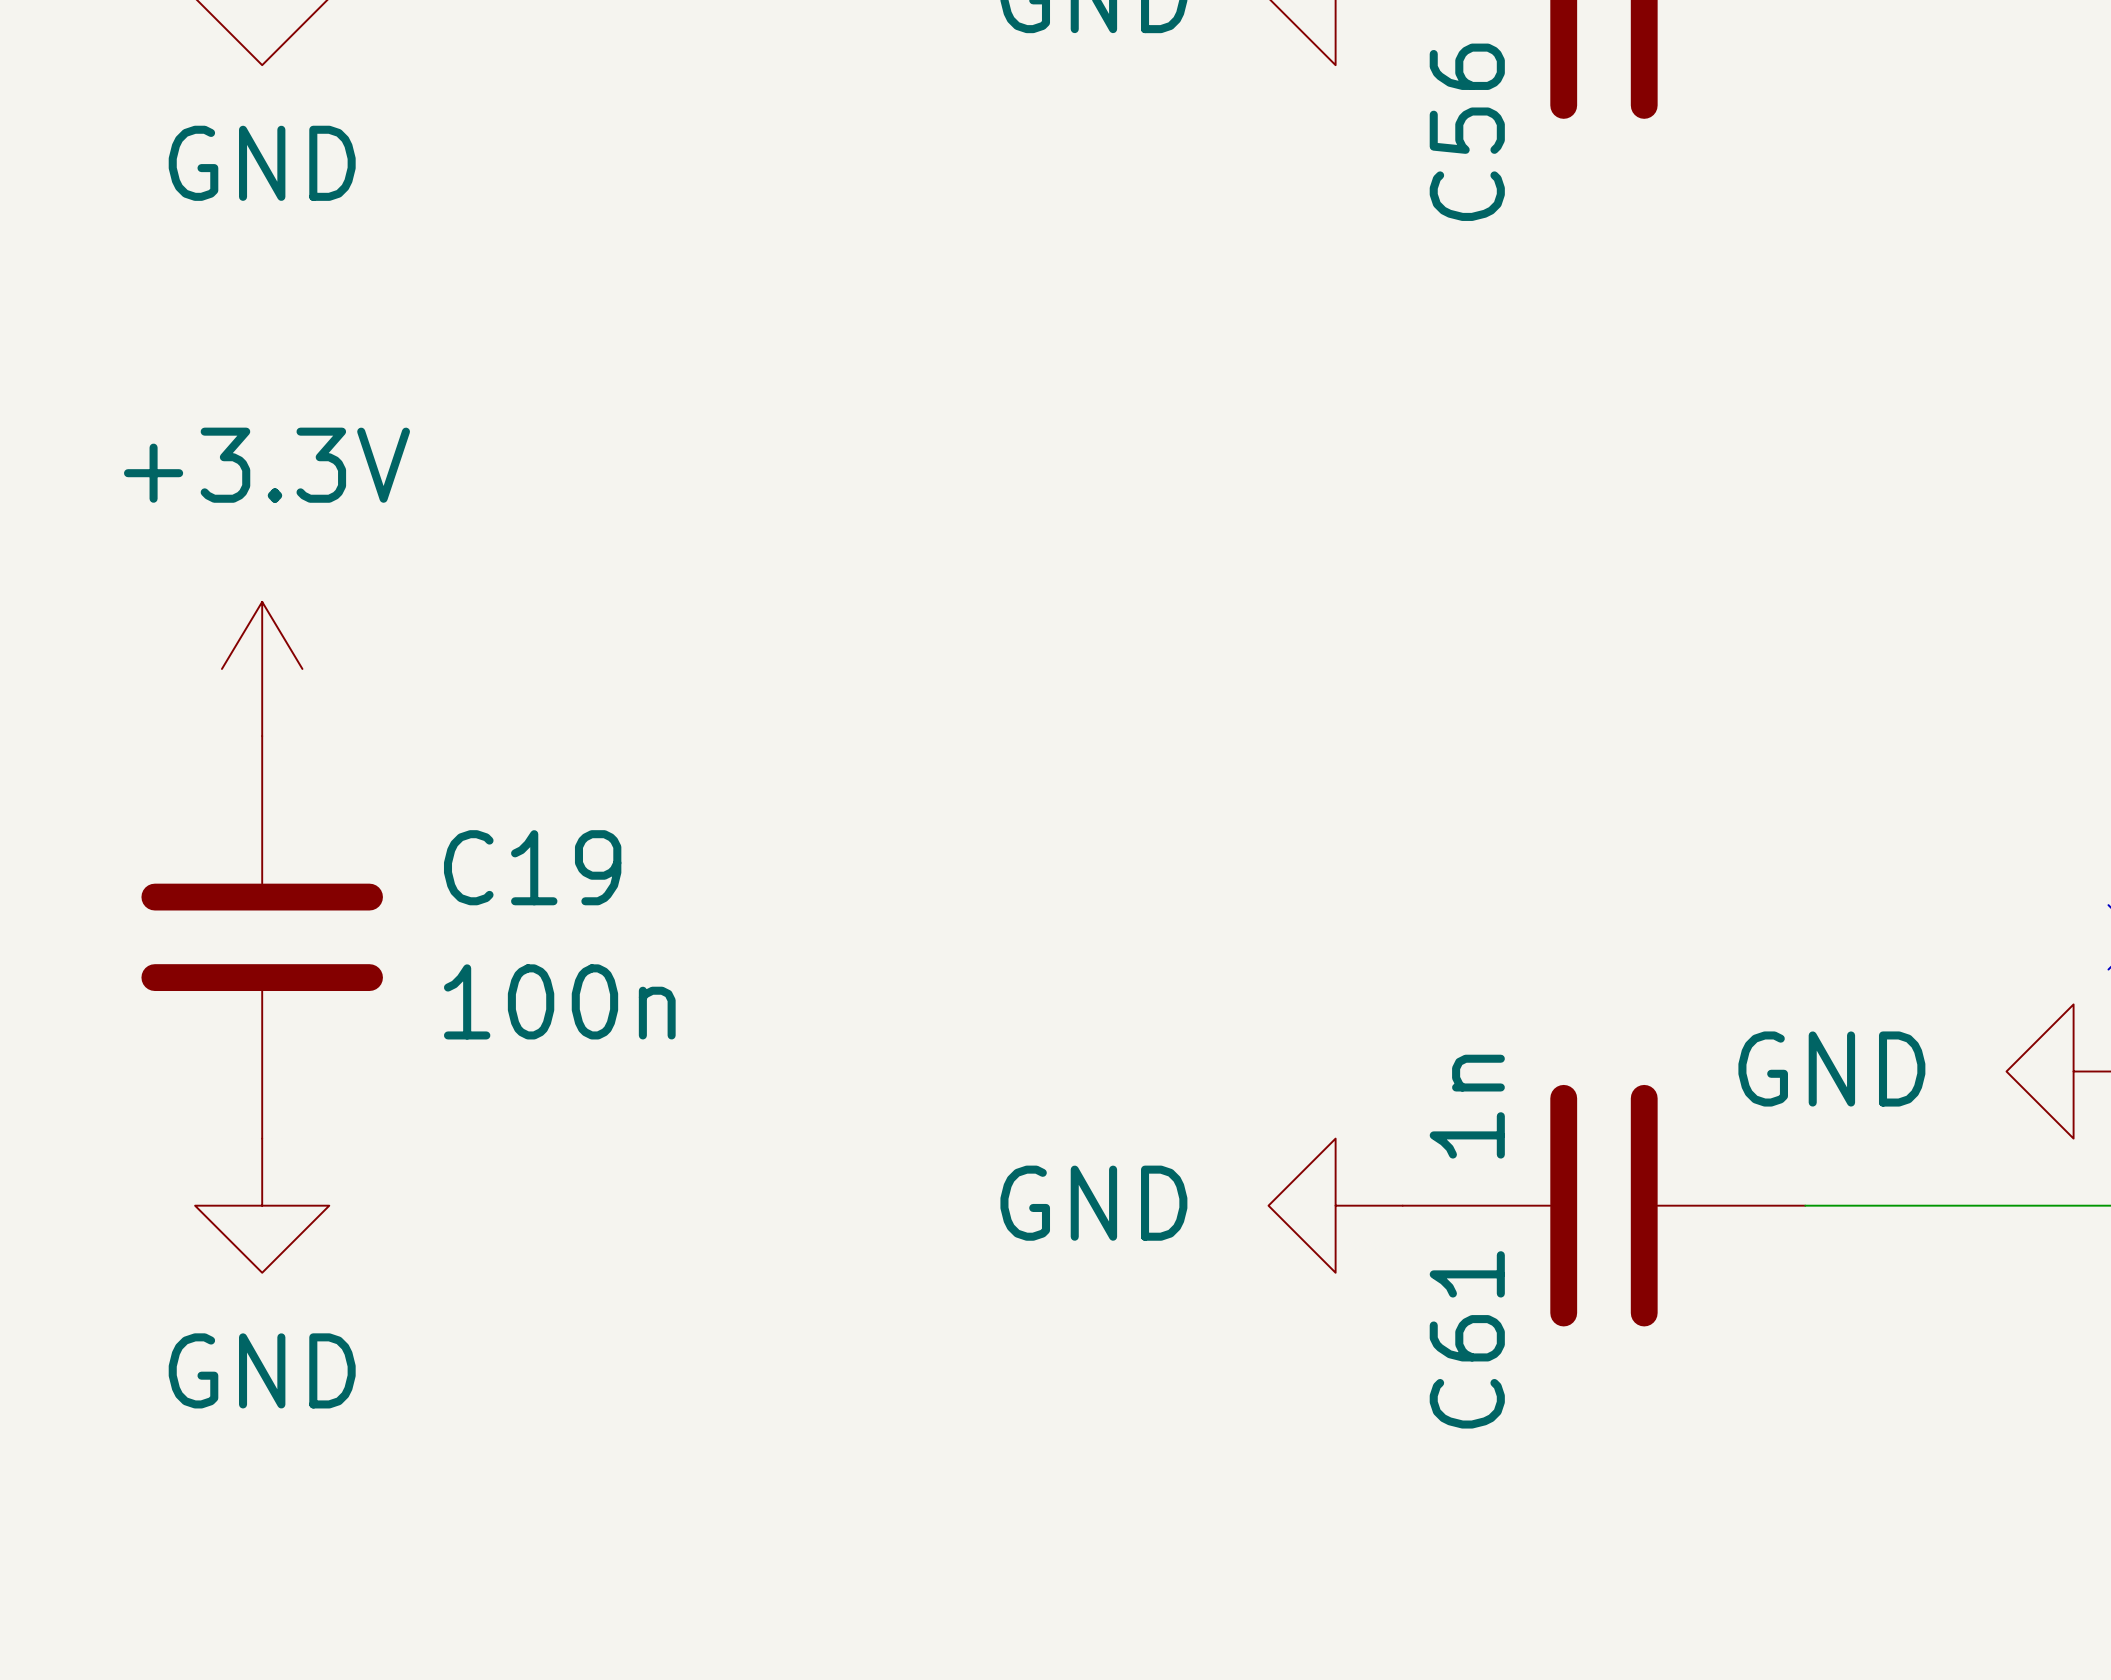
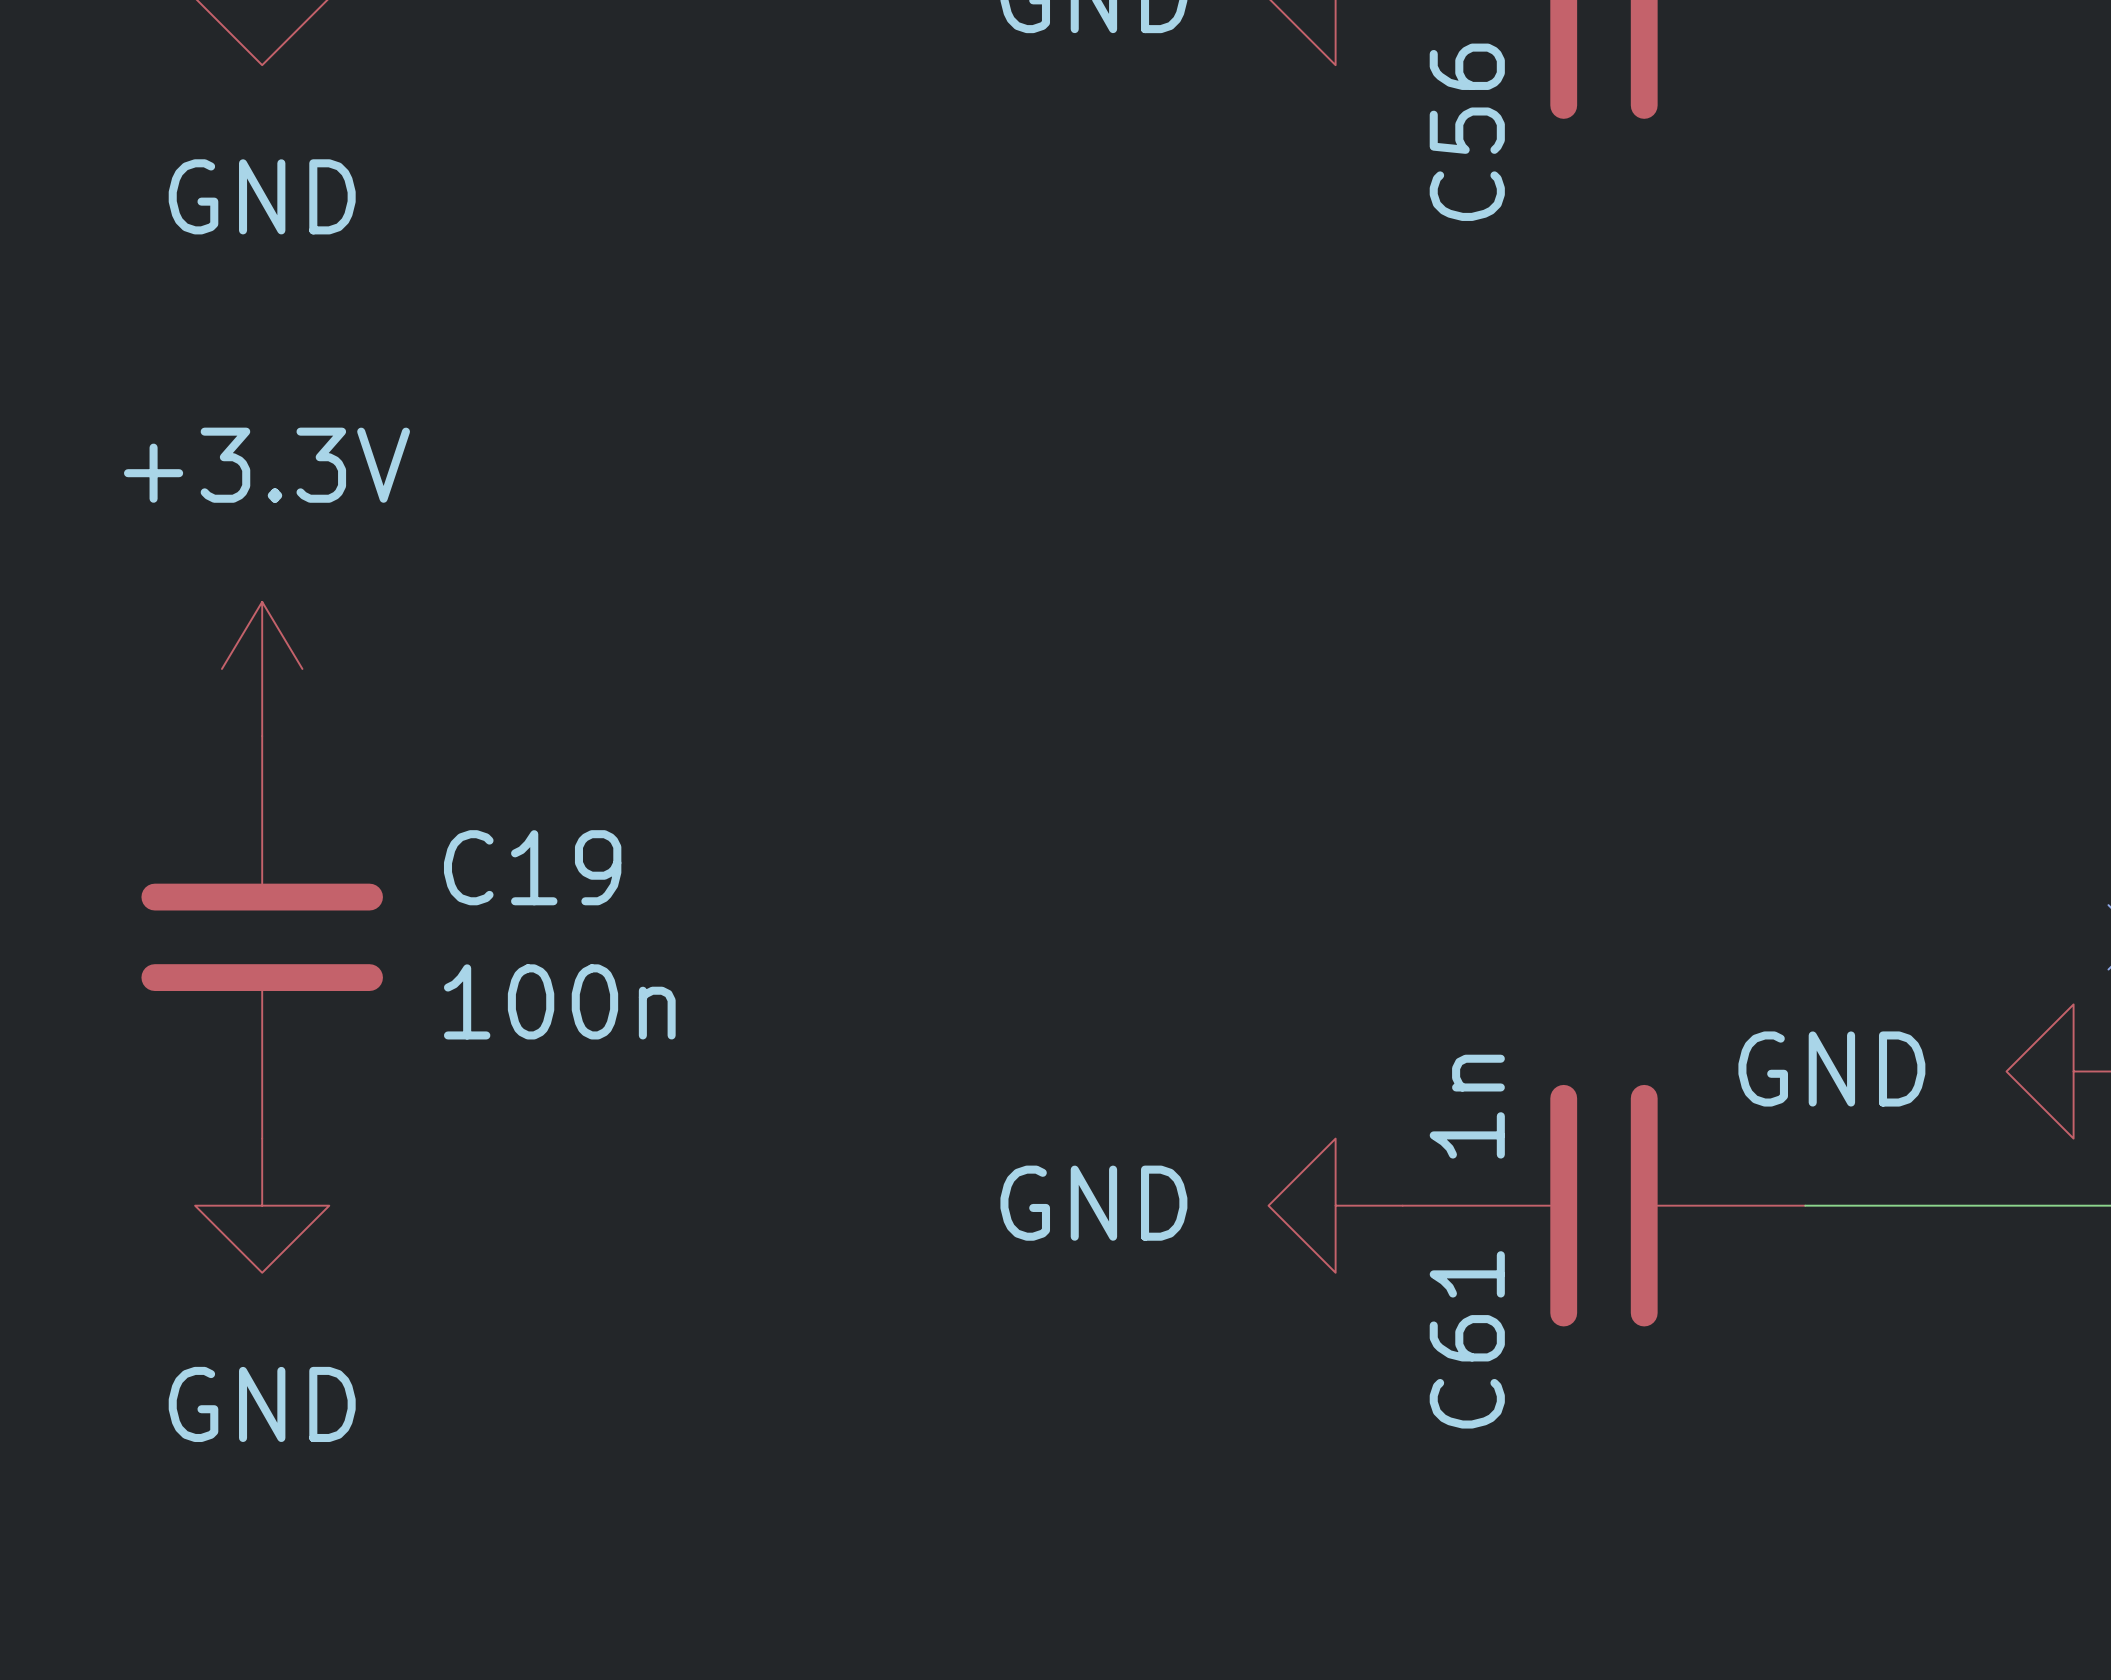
power symbol text position: GND (262, 163) -> GND (262, 196)
power symbol text position: GND (262, 1370) -> GND (262, 1404)

